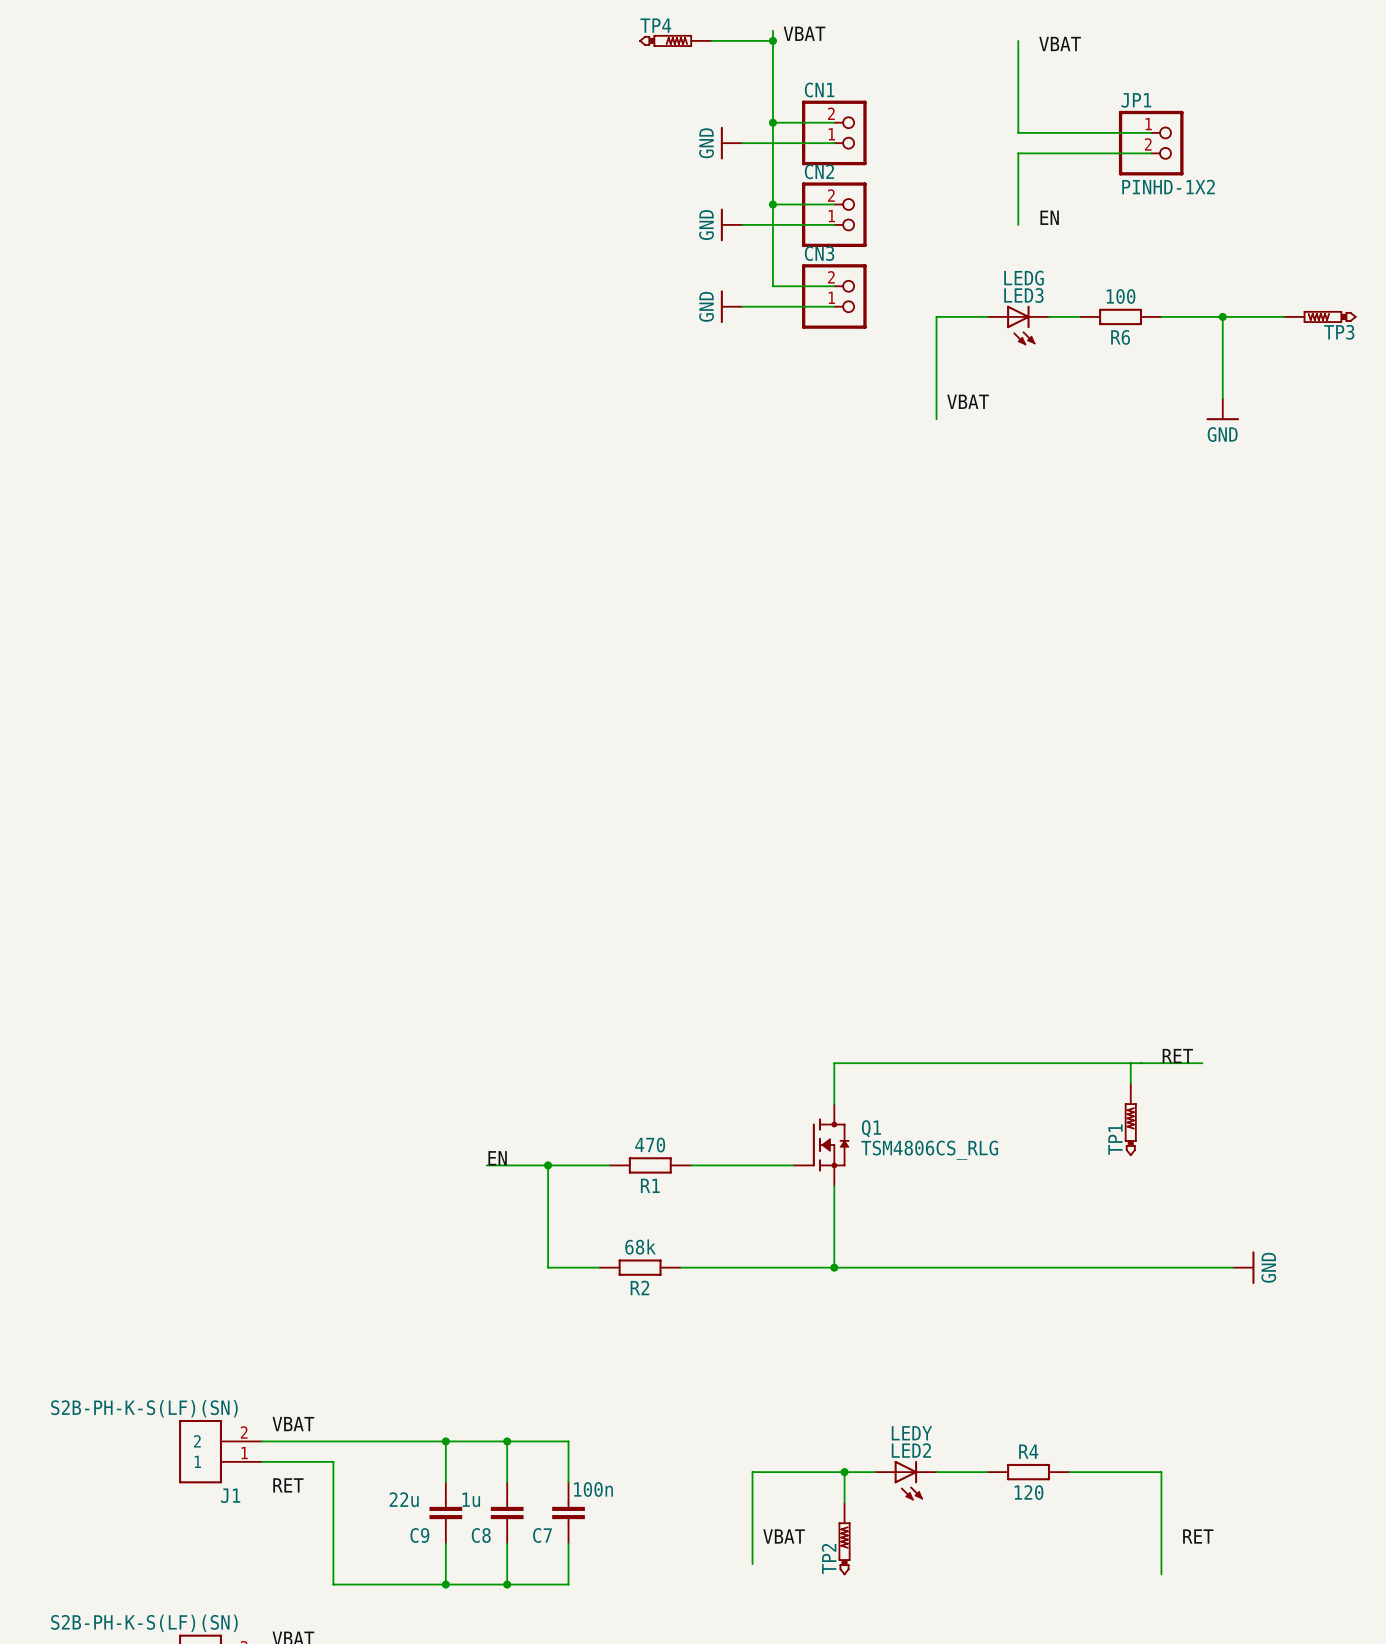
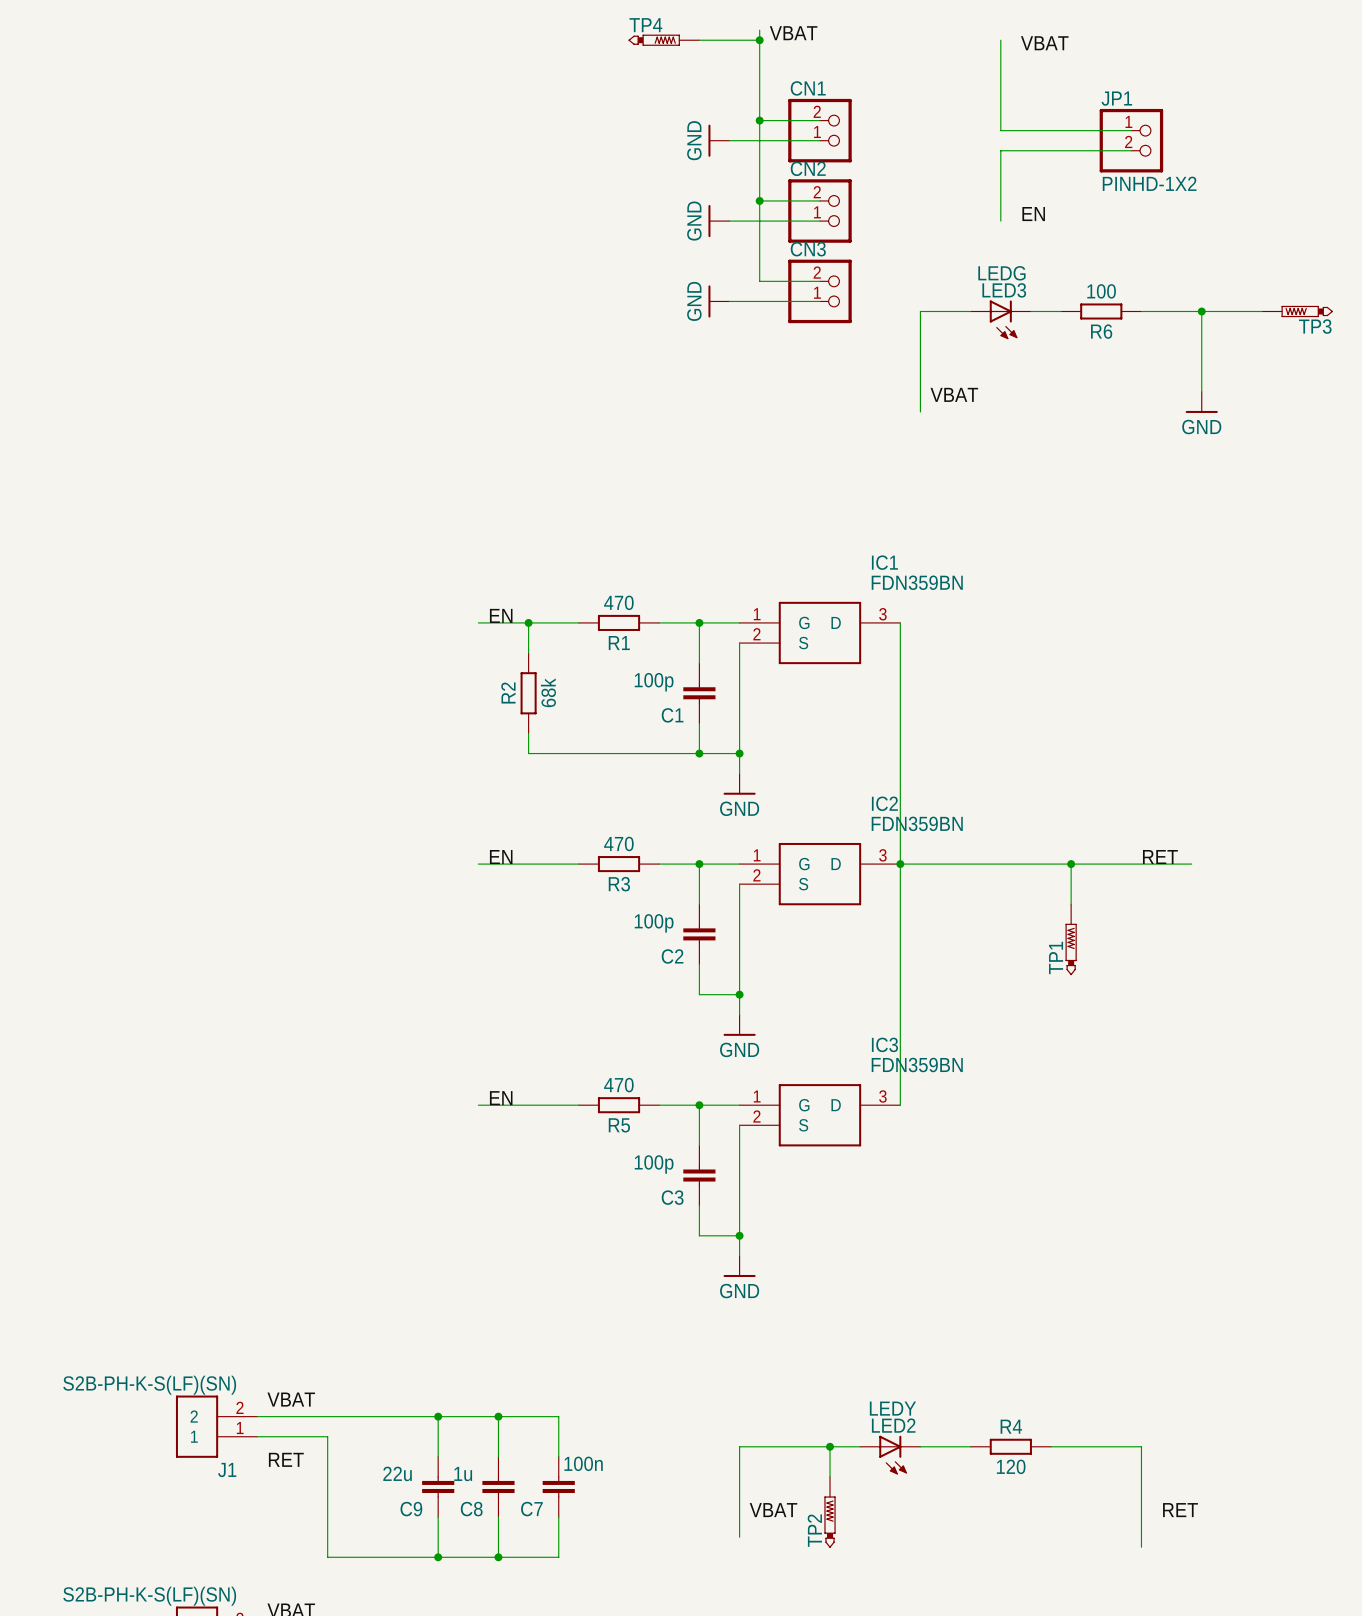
label: none -> EN (501, 615)
wire: none -> (478, 622) (578, 622)
wire: none -> (528, 622) (528, 653)
junction: none -> (528, 622)
wire: none -> (659, 622) (739, 622)
wire: none -> (699, 622) (699, 663)
junction: none -> (699, 622)
wire: none -> (900, 622) (900, 1105)
IC1: none -> FDN359BN (819, 632)
wire: none -> (739, 643) (739, 773)
C1: none -> 100p (699, 693)
wire: none -> (699, 723) (699, 753)
wire: none -> (528, 733) (528, 753) (739, 753)
junction: none -> (699, 753)
junction: none -> (739, 753)
power symbol: none -> GND (739, 784)
label: none -> EN (501, 857)
wire: none -> (478, 864) (578, 864)
R3: none -> 470 (619, 864)
wire: none -> (659, 864) (739, 864)
wire: none -> (699, 864) (699, 904)
junction: none -> (699, 864)
wire: none -> (900, 864) (1191, 864)
junction: none -> (900, 864)
wire: none -> (1071, 864) (1071, 904)
junction: none -> (1071, 864)
IC2: none -> FDN359BN (819, 874)
wire: none -> (739, 884) (739, 1014)
C2: none -> 100p (699, 934)
wire: none -> (699, 964) (699, 994) (739, 994)
junction: none -> (739, 994)
power symbol: none -> GND (739, 1025)
label position: RET (1177, 1056) -> RET (1160, 857)
wire: (1130, 1063) (1130, 1083) -> none
wire: (1202, 1063) (834, 1063) (834, 1104) -> none
TP1 position: (1130, 1119) -> (1071, 939)
wire: none -> (478, 1105) (578, 1105)
R5: none -> 470 (619, 1105)
wire: none -> (659, 1105) (739, 1105)
wire: none -> (699, 1105) (699, 1145)
junction: none -> (699, 1105)
IC3: none -> FDN359BN (819, 1115)
wire: none -> (739, 1125) (739, 1255)
Q1: TSM4806CS_RLG (821, 1144) -> none
label position: EN (497, 1158) -> EN (501, 1098)
wire: (486, 1165) (609, 1165) -> none
wire: (548, 1165) (548, 1267) (599, 1267) -> none
junction: (548, 1165) -> none
R1 position: (650, 1165) -> (619, 622)
wire: (691, 1165) (793, 1165) -> none
wire: (834, 1185) (834, 1267) -> none
C3: none -> 100p (699, 1175)
wire: none -> (699, 1205) (699, 1235) (739, 1235)
junction: none -> (739, 1235)
R2 rotation: 0° (640, 1267) -> 90° clockwise (528, 693)
R2 position: (640, 1267) -> (528, 693)
wire: (680, 1267) (1233, 1267) -> none
junction: (834, 1267) -> none
power symbol: GND (1243, 1267) -> none
power symbol: none -> GND (739, 1266)

